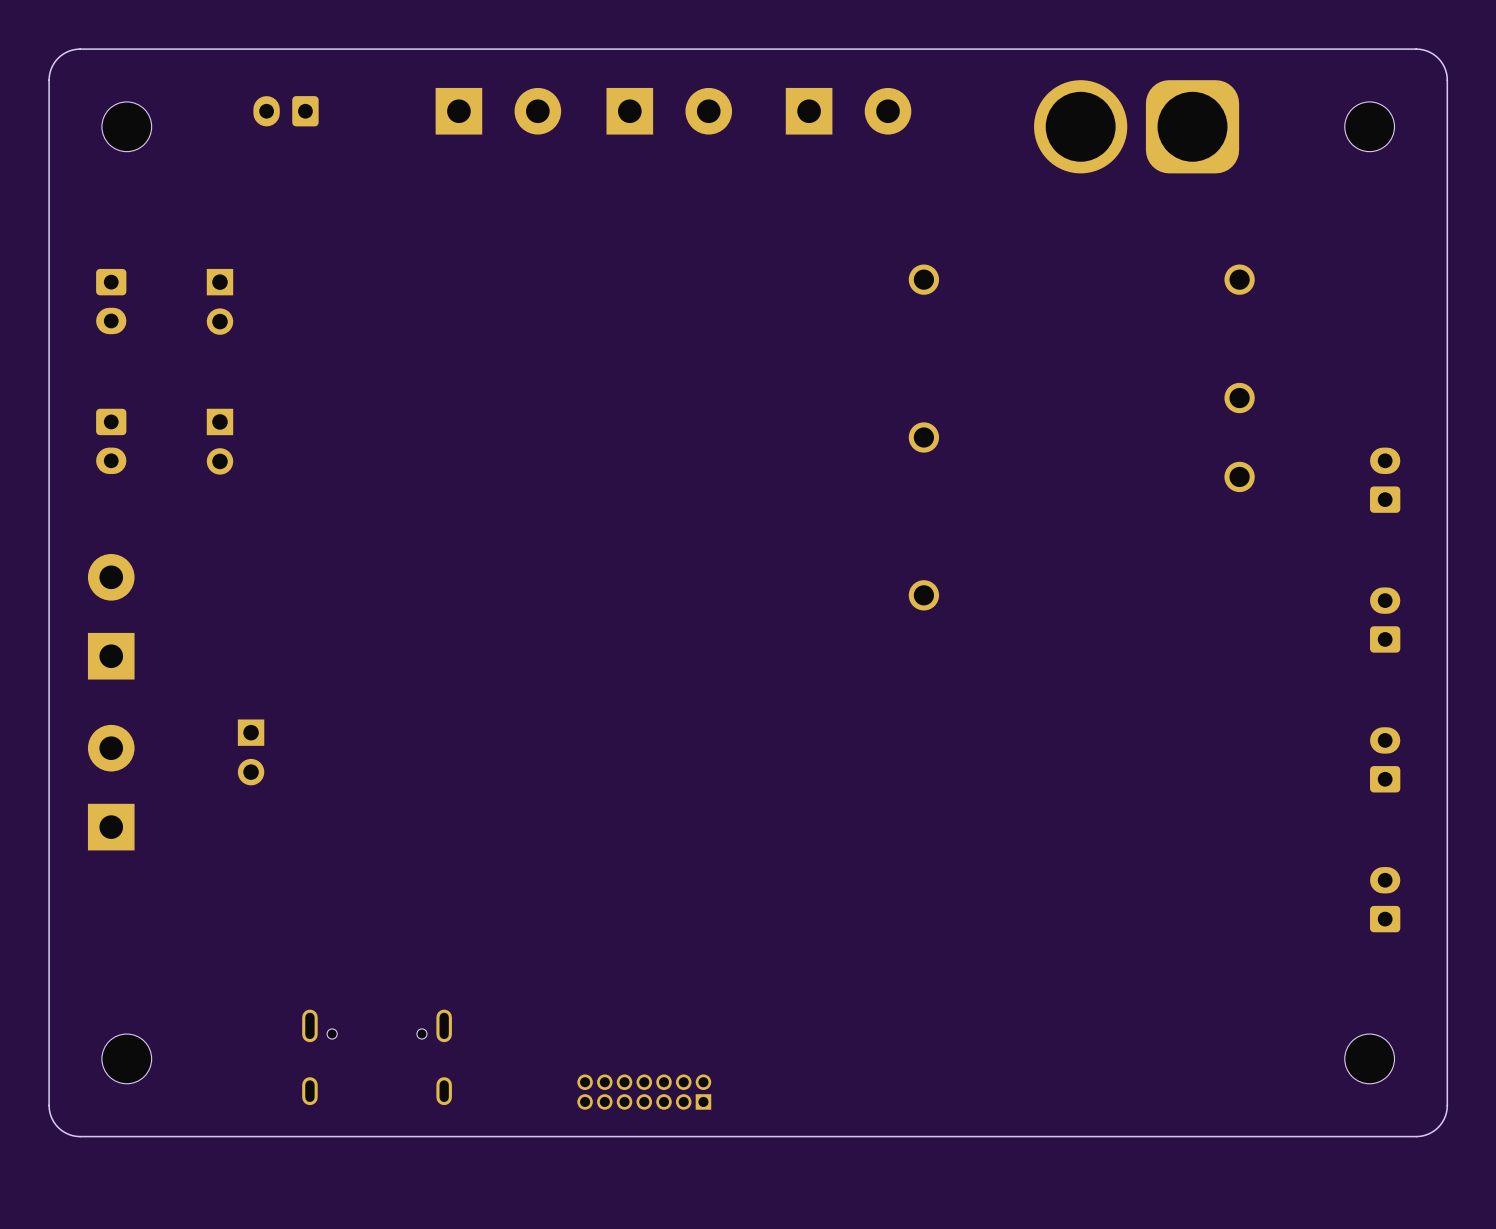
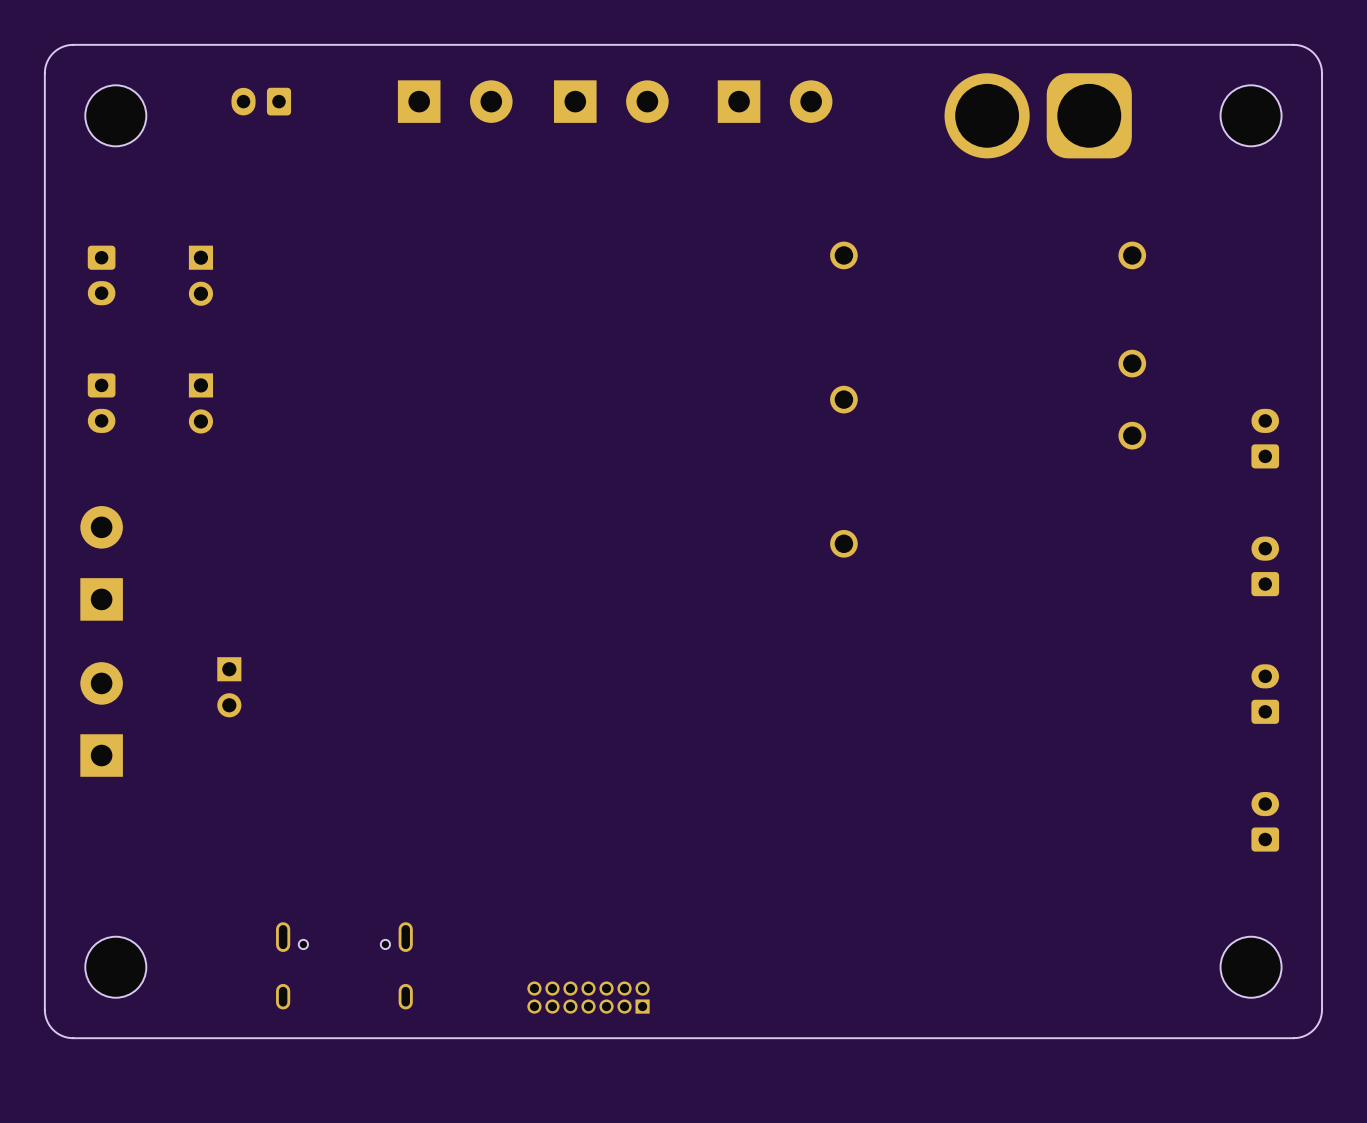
part footprint: [101, 101, 152, 152] -> [85, 85, 147, 147]
part footprint: [1344, 101, 1395, 152] -> [1220, 85, 1282, 147]
part footprint: [101, 1034, 152, 1084] -> [85, 936, 147, 998]
part footprint: [1344, 1034, 1395, 1084] -> [1220, 936, 1282, 998]

